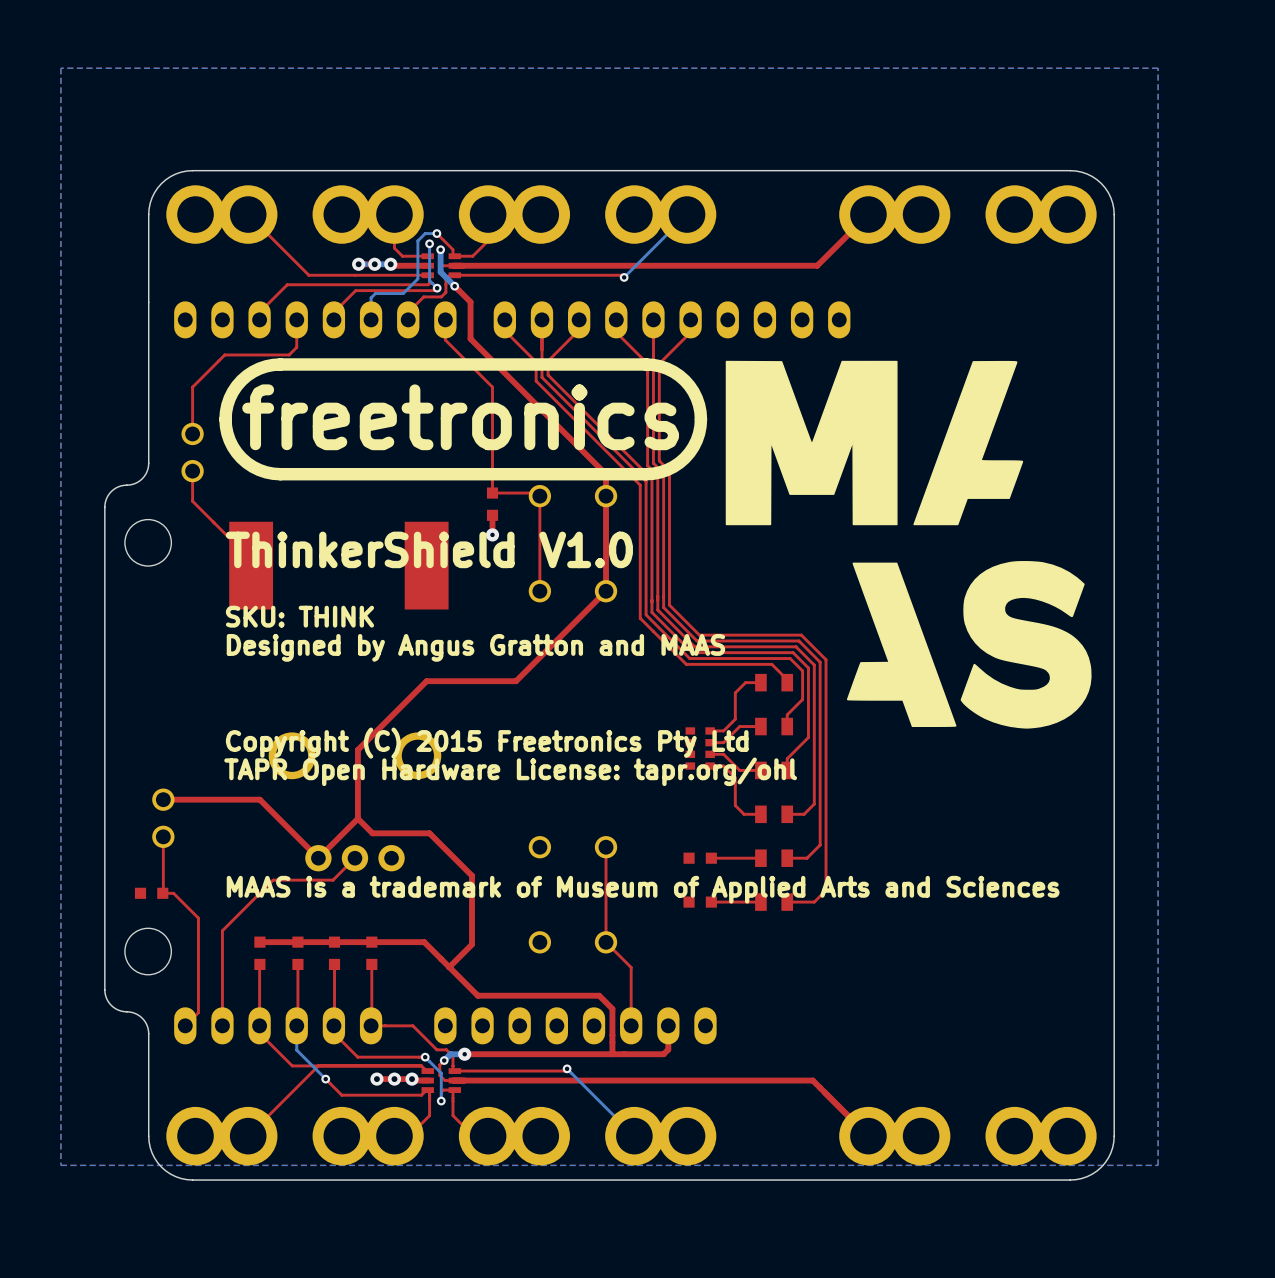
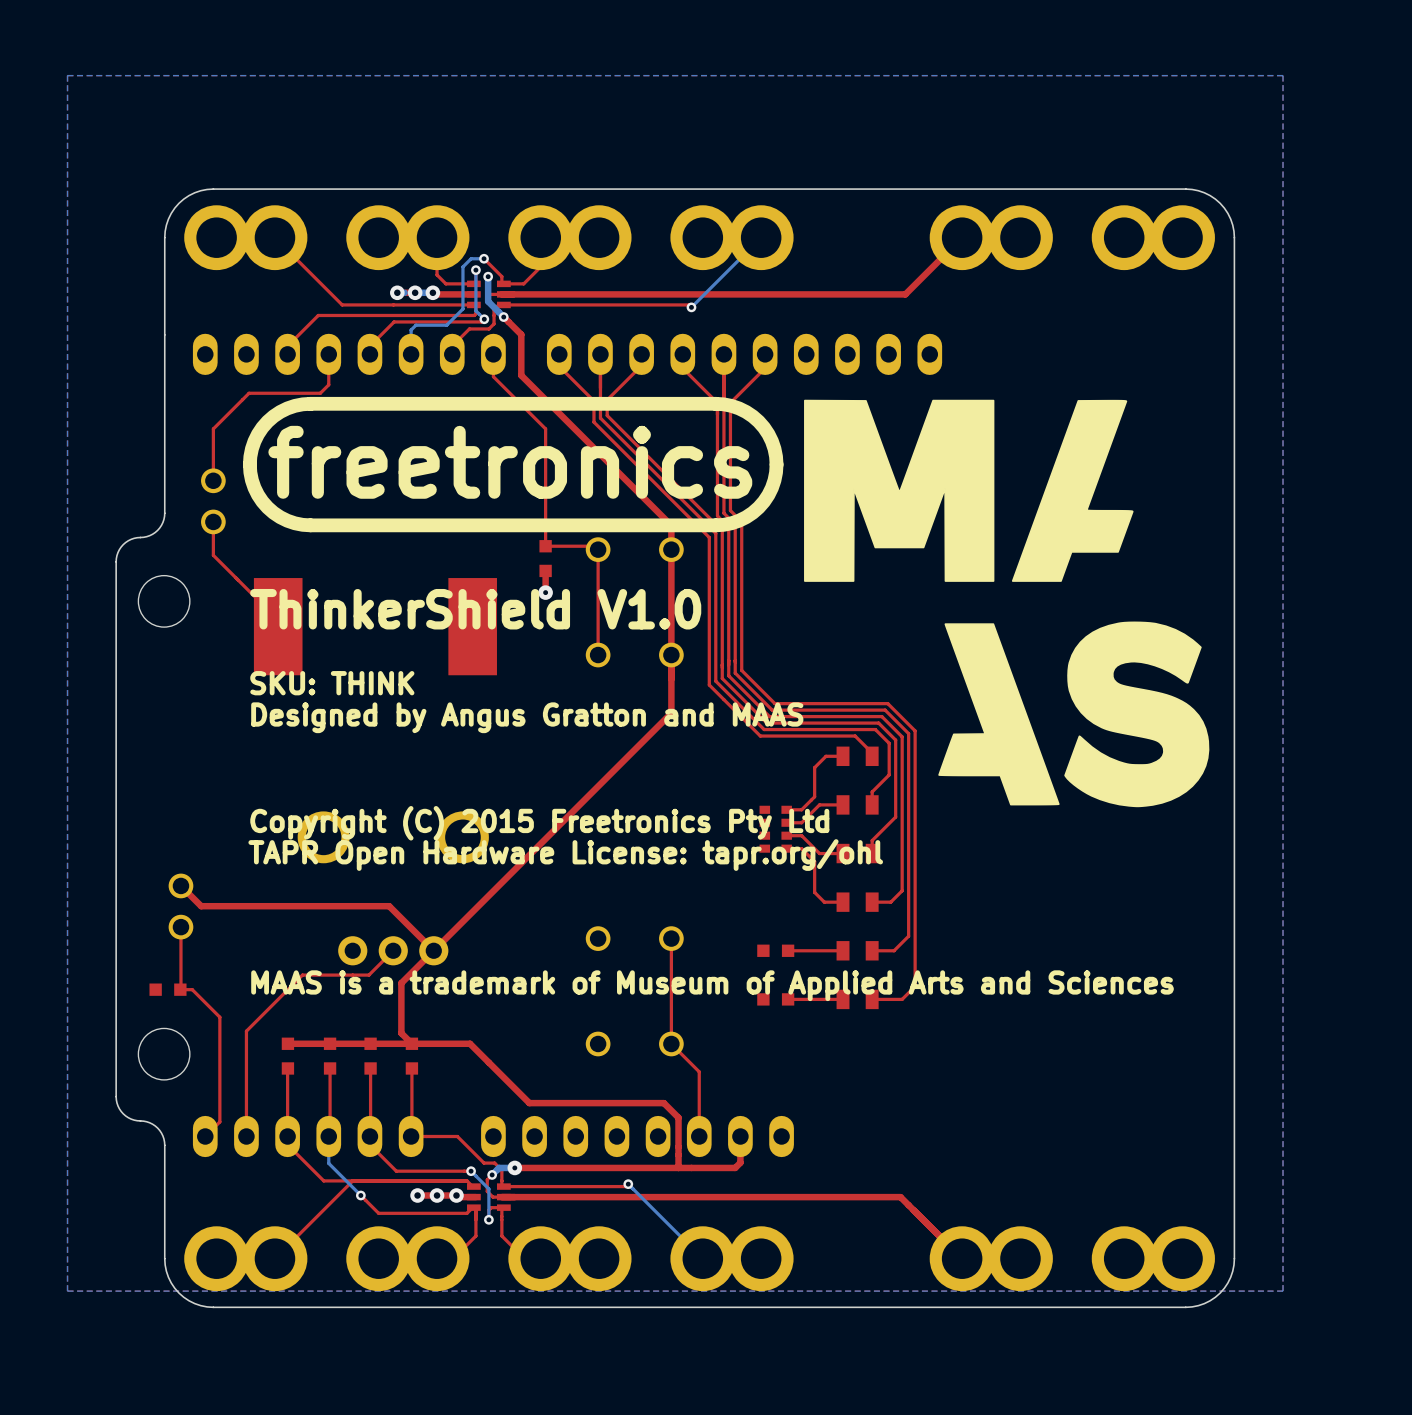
top track: (606, 591) (516, 681) (426, 681) (357, 749) (357, 818) -> (671, 655) (671, 713) (401, 983) (401, 1033) (411, 1043)
top track: (163, 799) (259, 799) (318, 858) (357, 818) -> (180, 885) (201, 906) (389, 906) (433, 950)
top track: (357, 818) (372, 833) (429, 833) (472, 875) (472, 944) (449, 967) -> none

